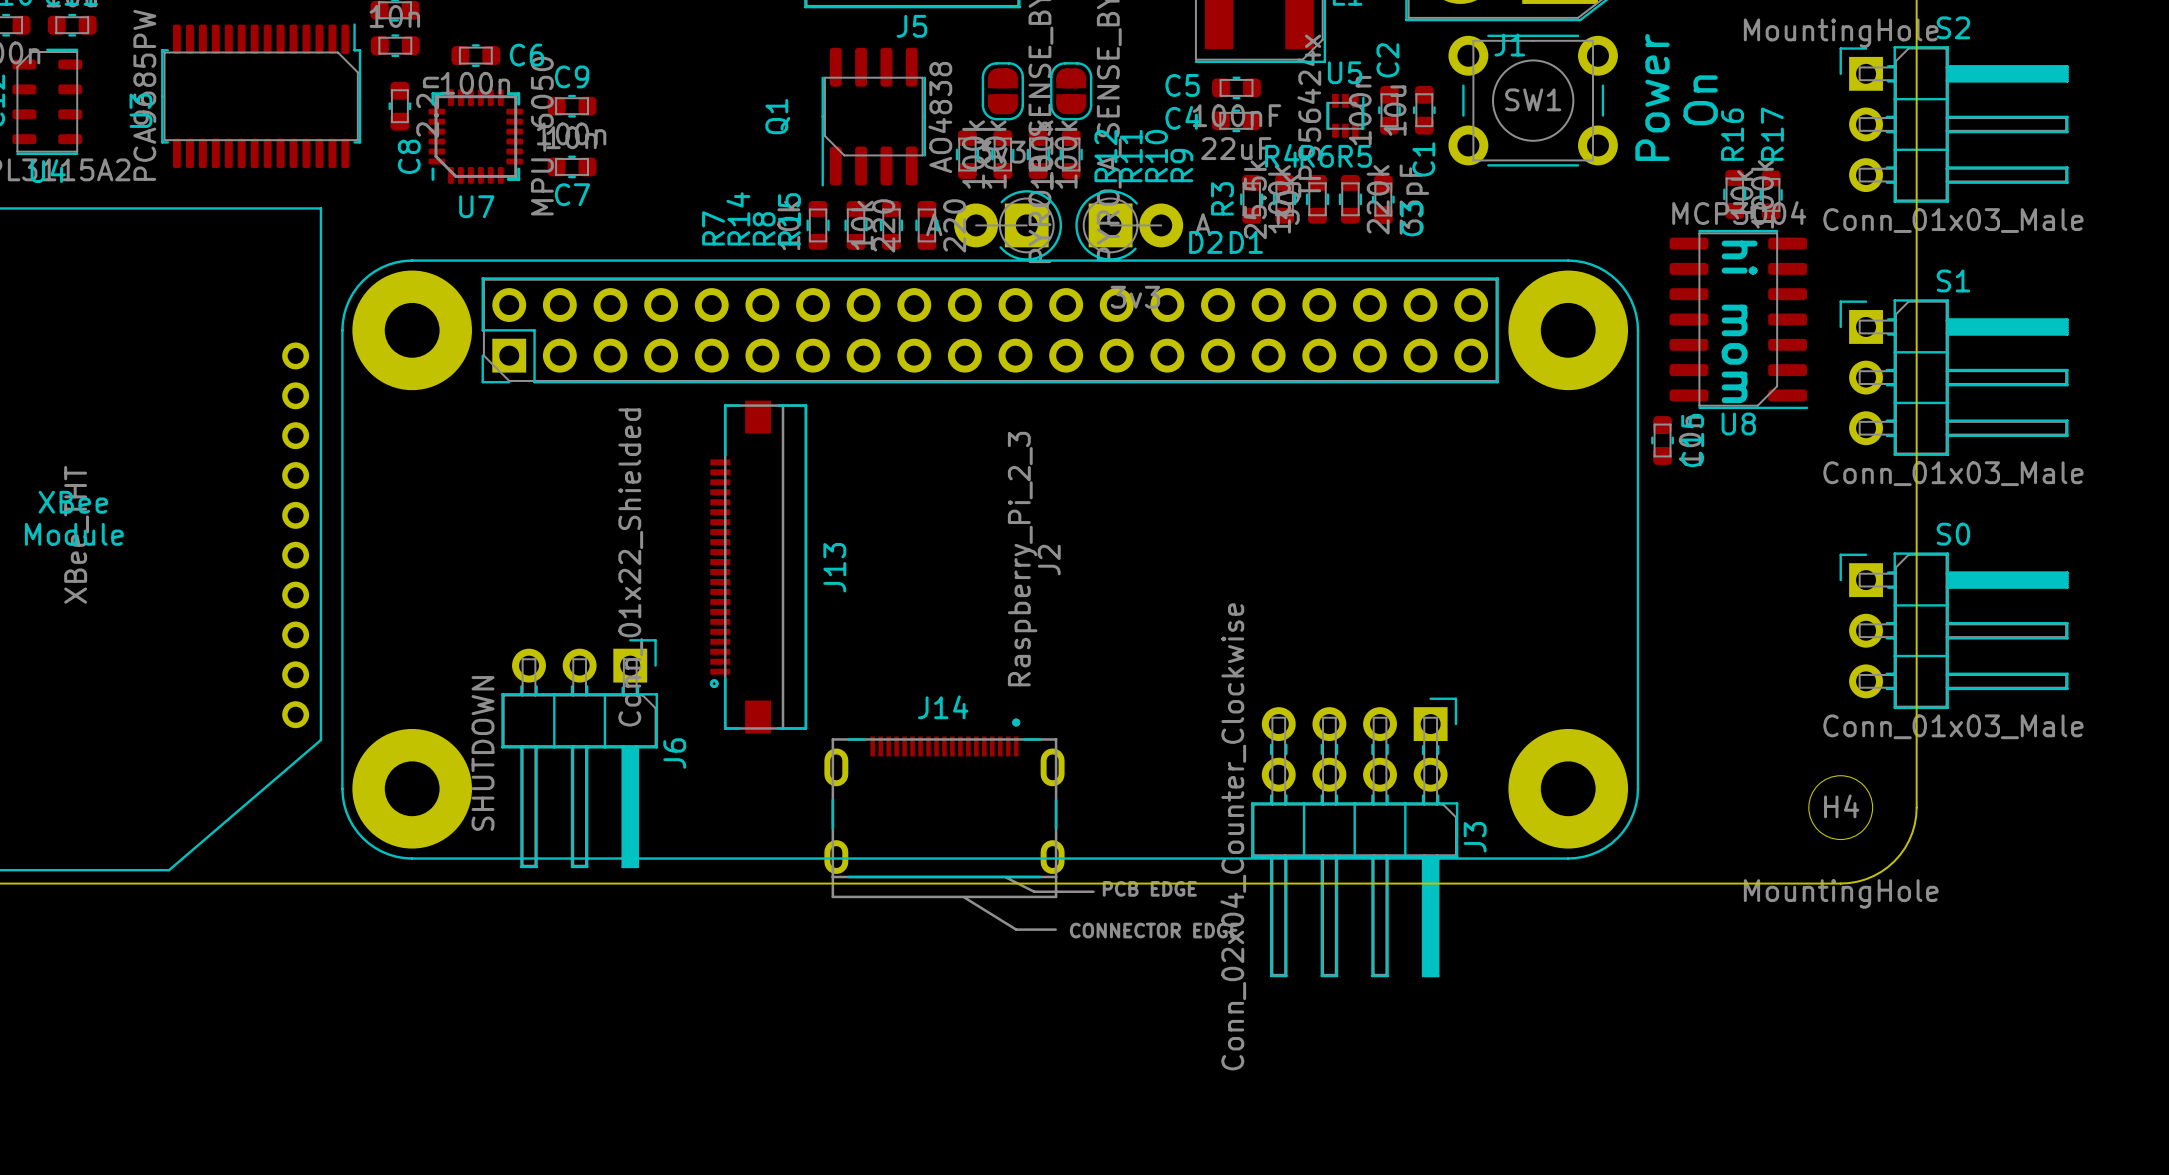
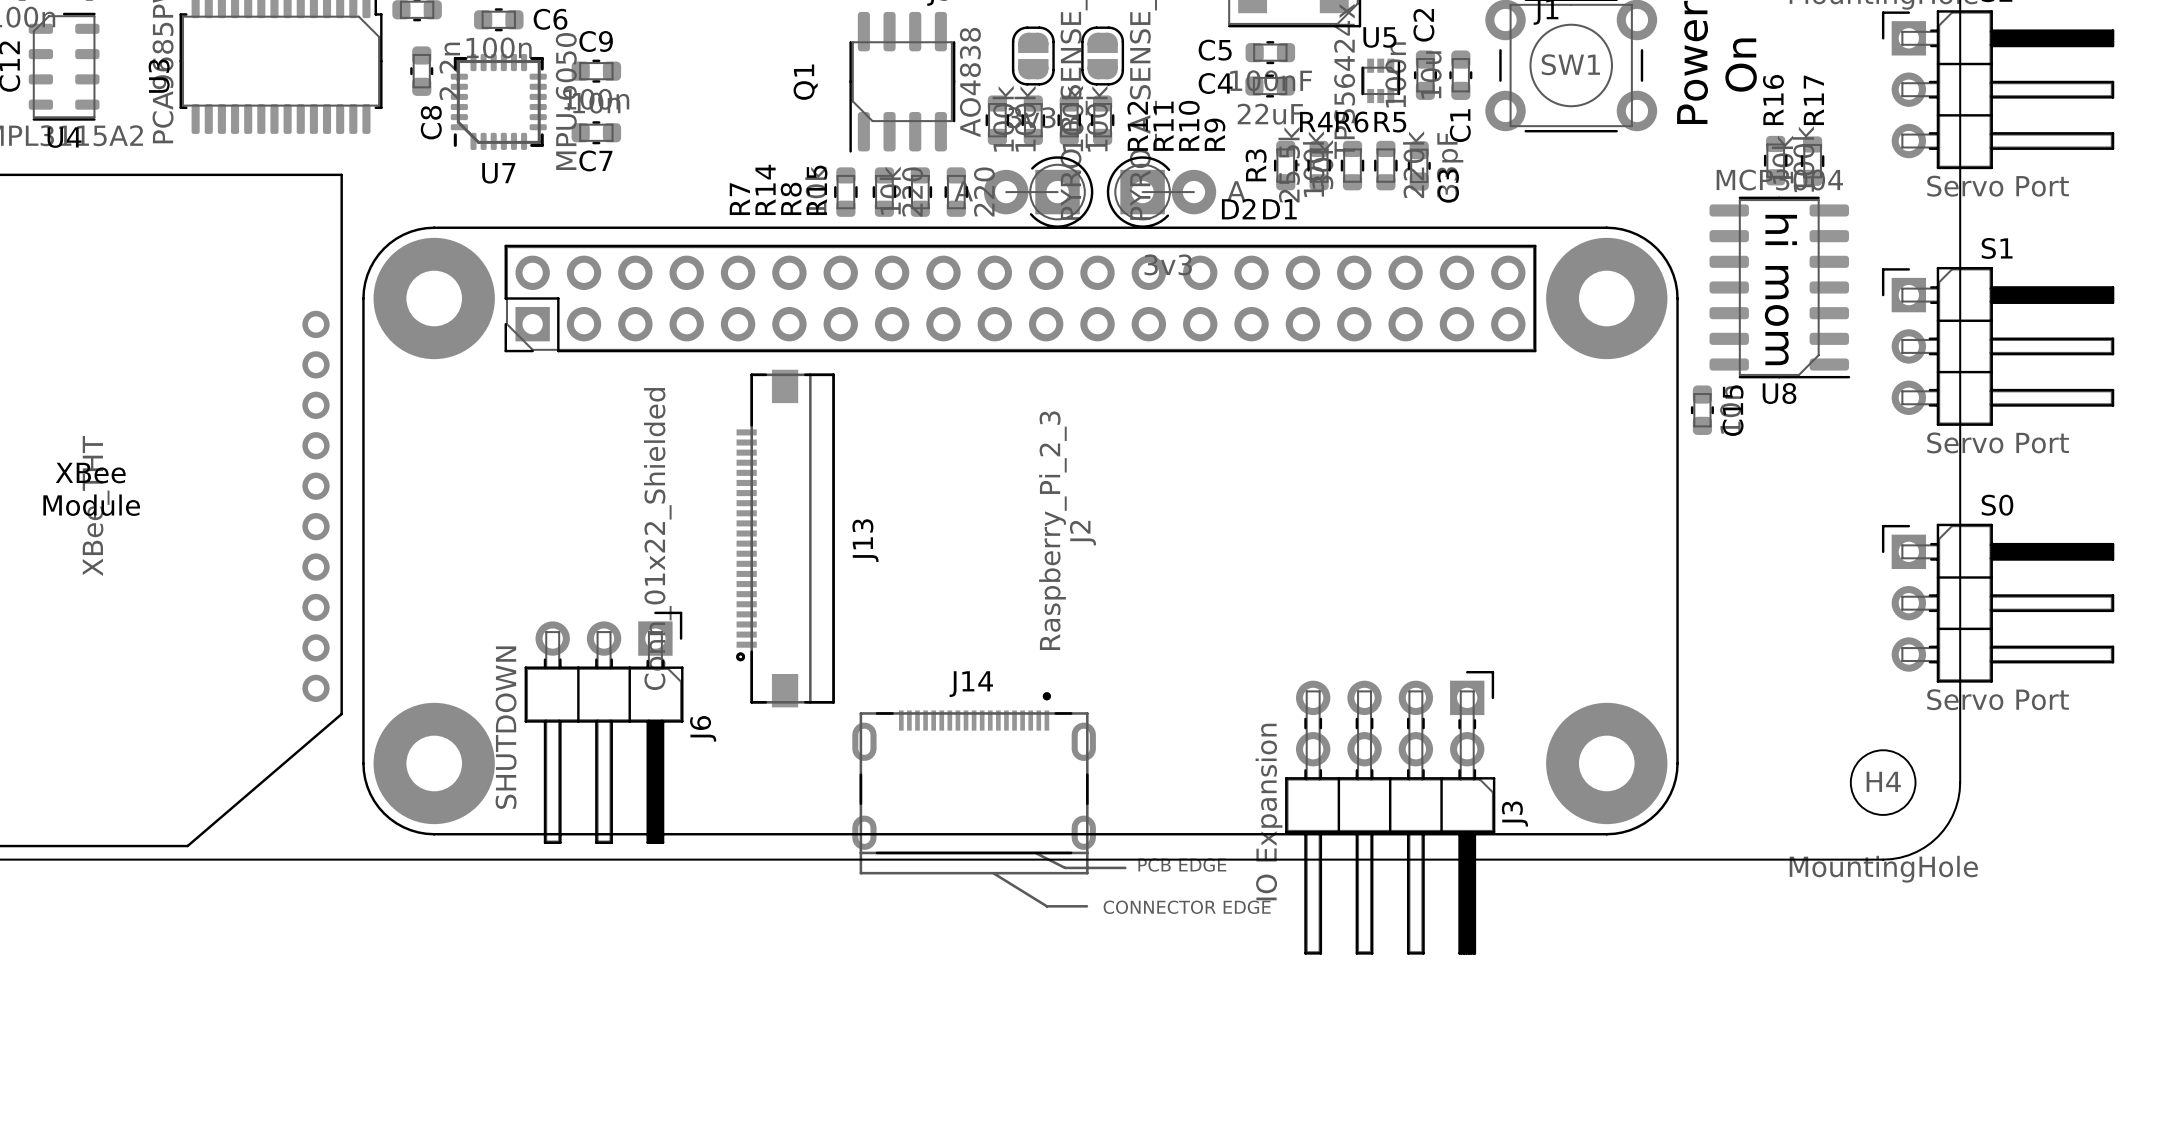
S2 value: Conn_01x03_Male (1953, 220) -> Servo Port (1998, 186)
S1 value: Conn_01x03_Male (1953, 473) -> Servo Port (1998, 442)
S0 value: Conn_01x03_Male (1953, 726) -> Servo Port (1998, 699)
J3 value: Conn_02x04_Counter_Clockwise (1233, 836) -> IO Expansion (1268, 812)

